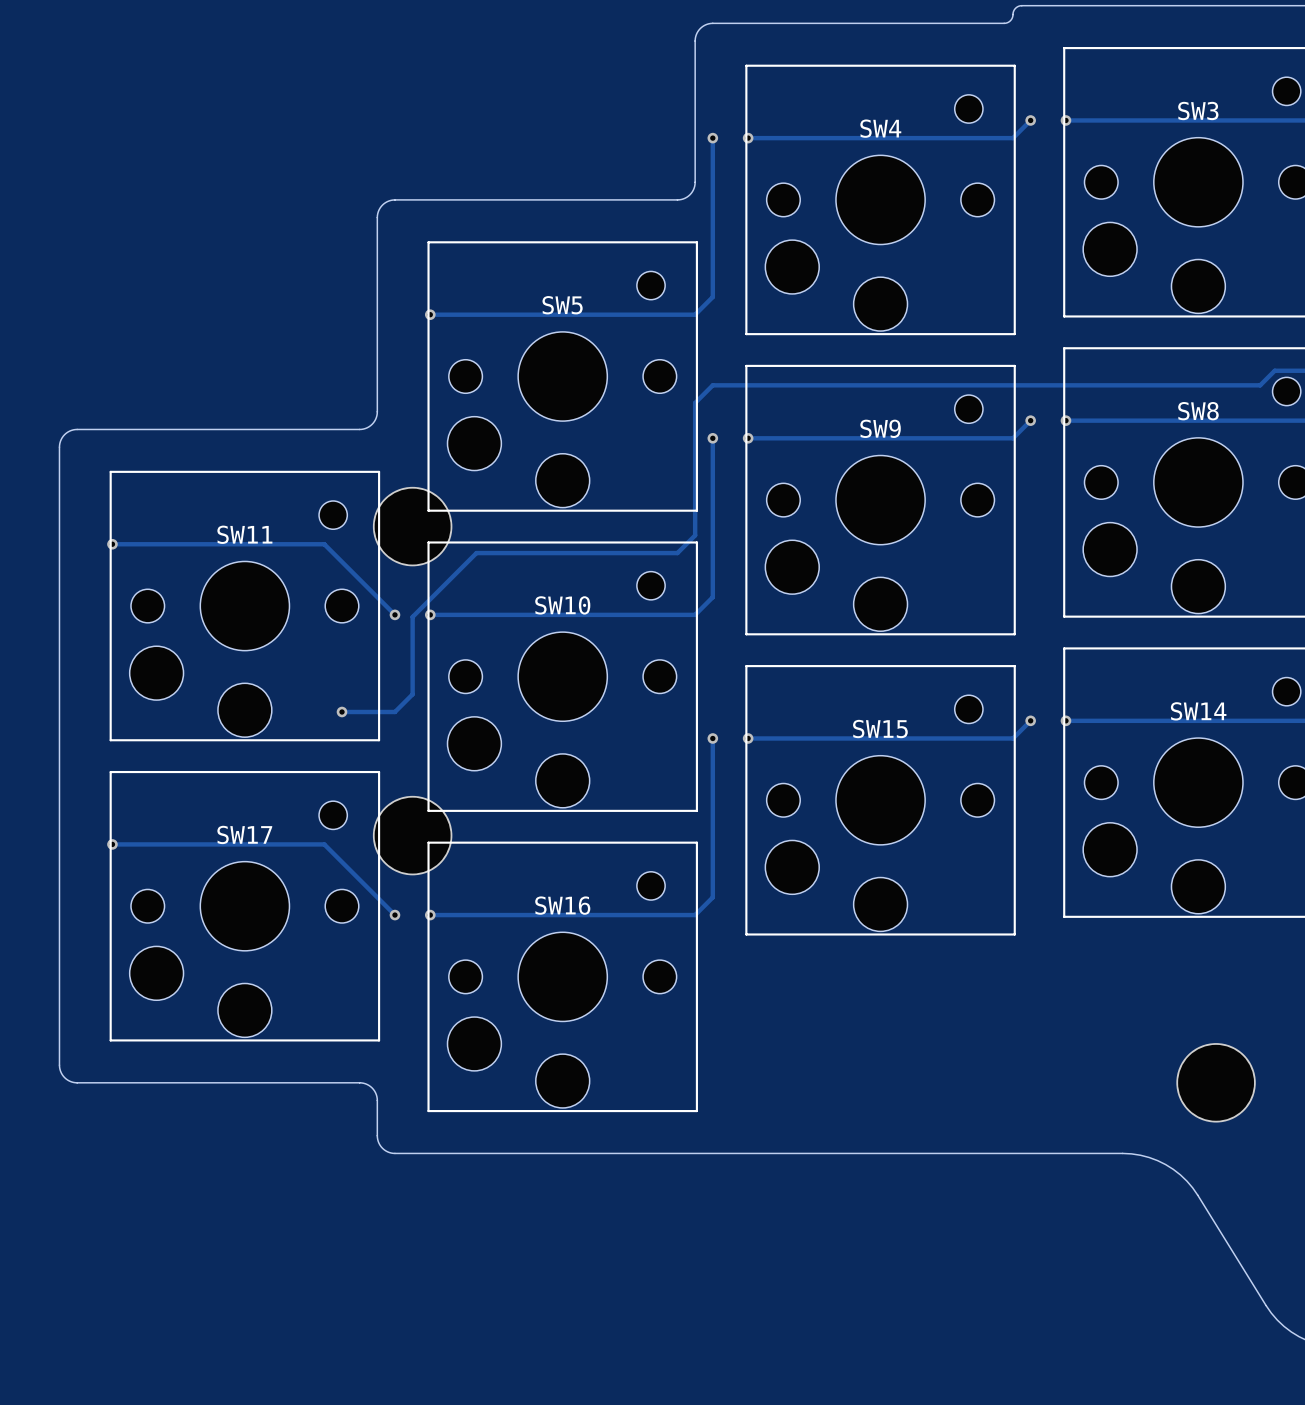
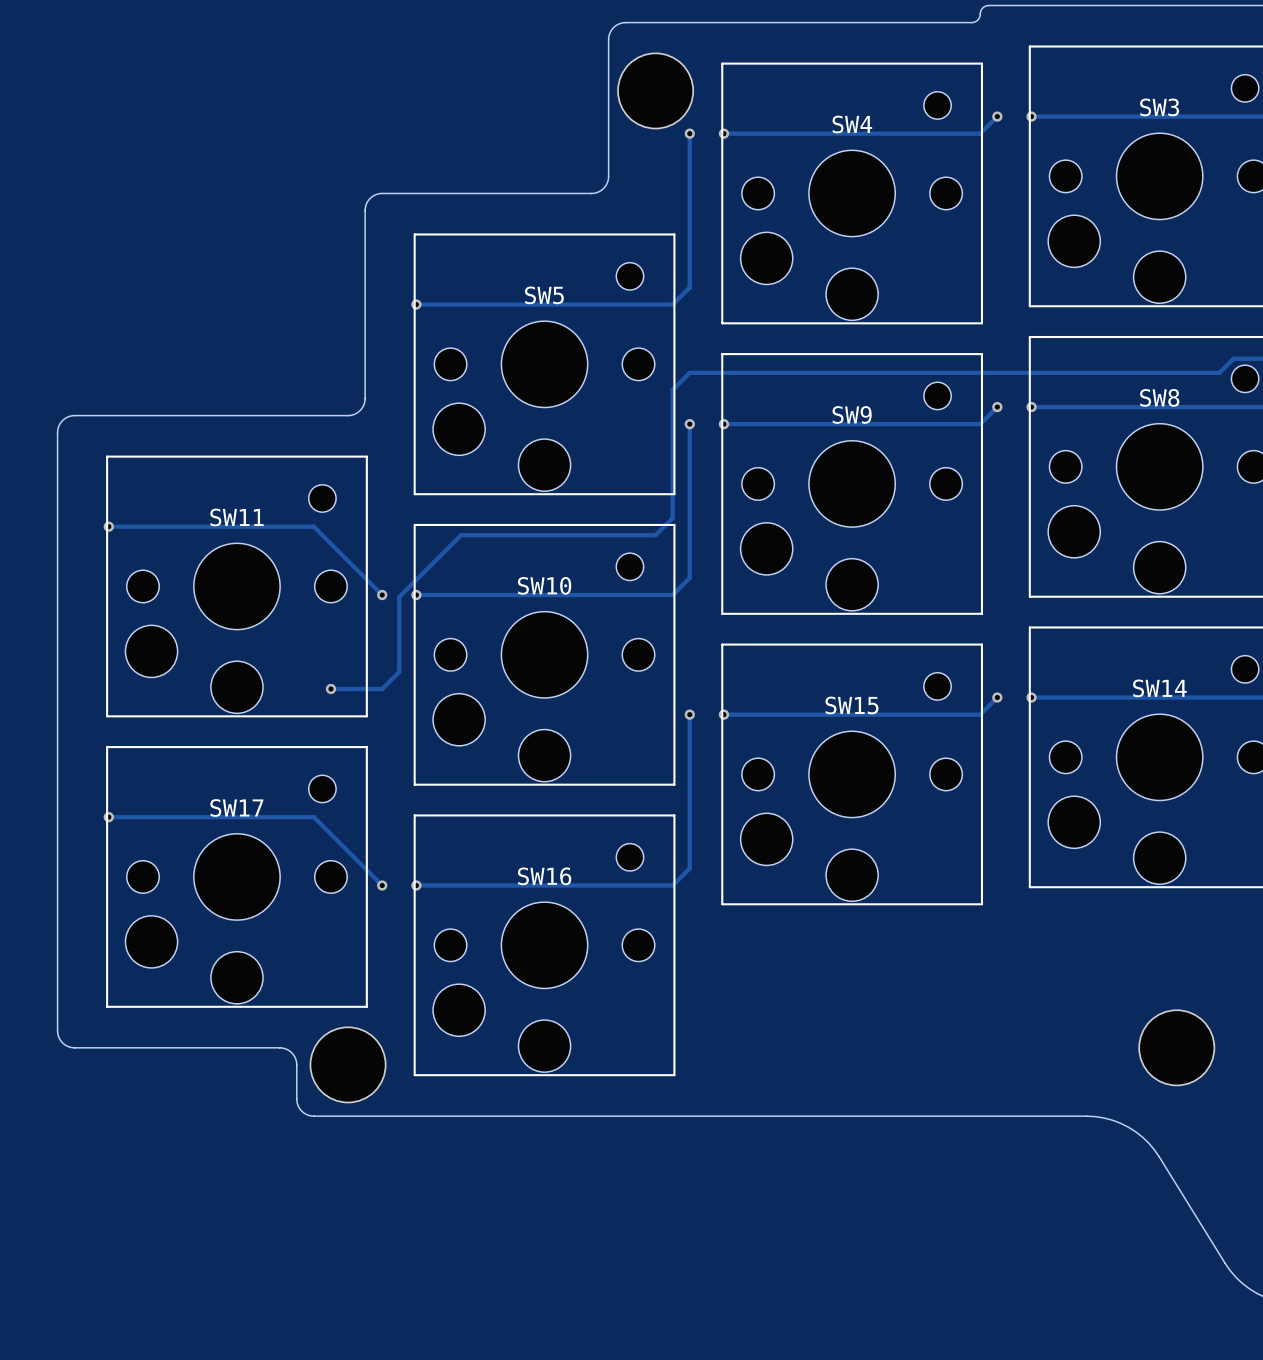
board edge: (712, 23) (701, 27) (695, 39) (695, 182) (692, 191) (686, 197) (679, 199) (611, 199) -> (689, 22) (623, 22) (616, 25) (611, 30) (608, 39) (608, 178) (602, 189) (591, 193)
part: none -> (655, 90)
part: (412, 526) -> none
part position: (412, 835) -> (348, 1064)
board edge: (289, 1082) (359, 1082) (369, 1085) (374, 1091) (377, 1098) (378, 1141) (385, 1150) (394, 1153) -> (279, 1047) (290, 1051) (295, 1059) (296, 1101) (299, 1108) (304, 1113) (313, 1116) (382, 1116)

